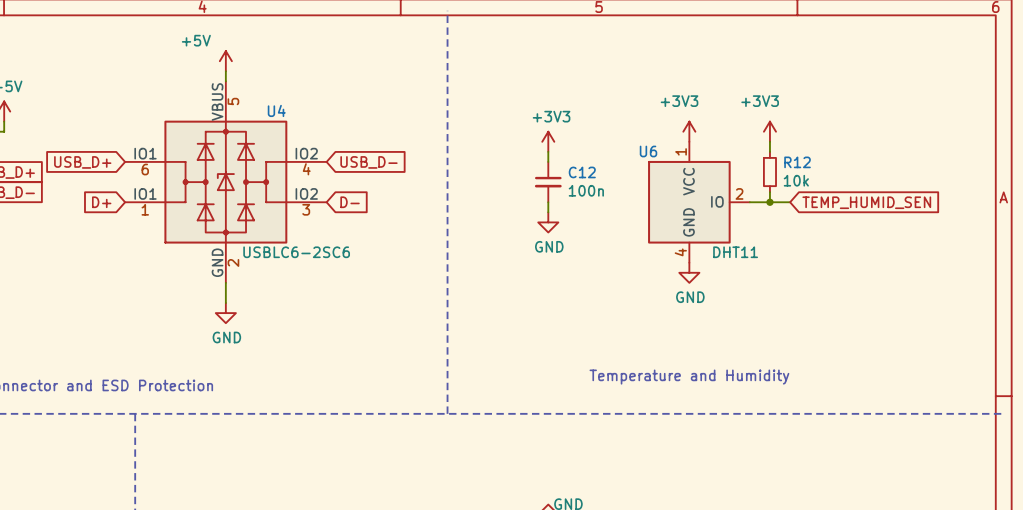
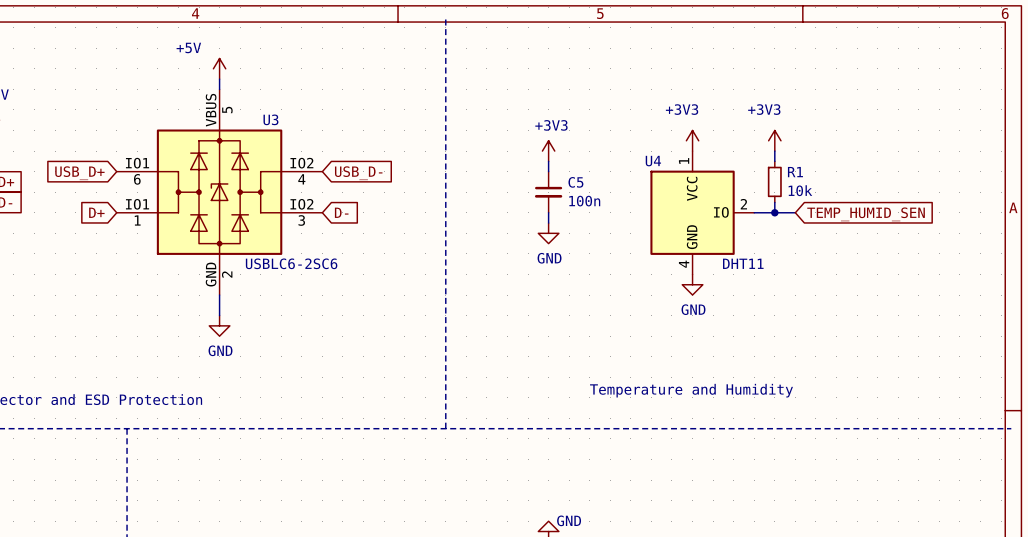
U4 name: U4 (276, 110) -> U3 (270, 119)
U6 name: U6 (648, 151) -> U4 (653, 161)
R12 name: R12 (797, 162) -> R1 (795, 172)
C12 name: C12 (582, 172) -> C5 (575, 182)

